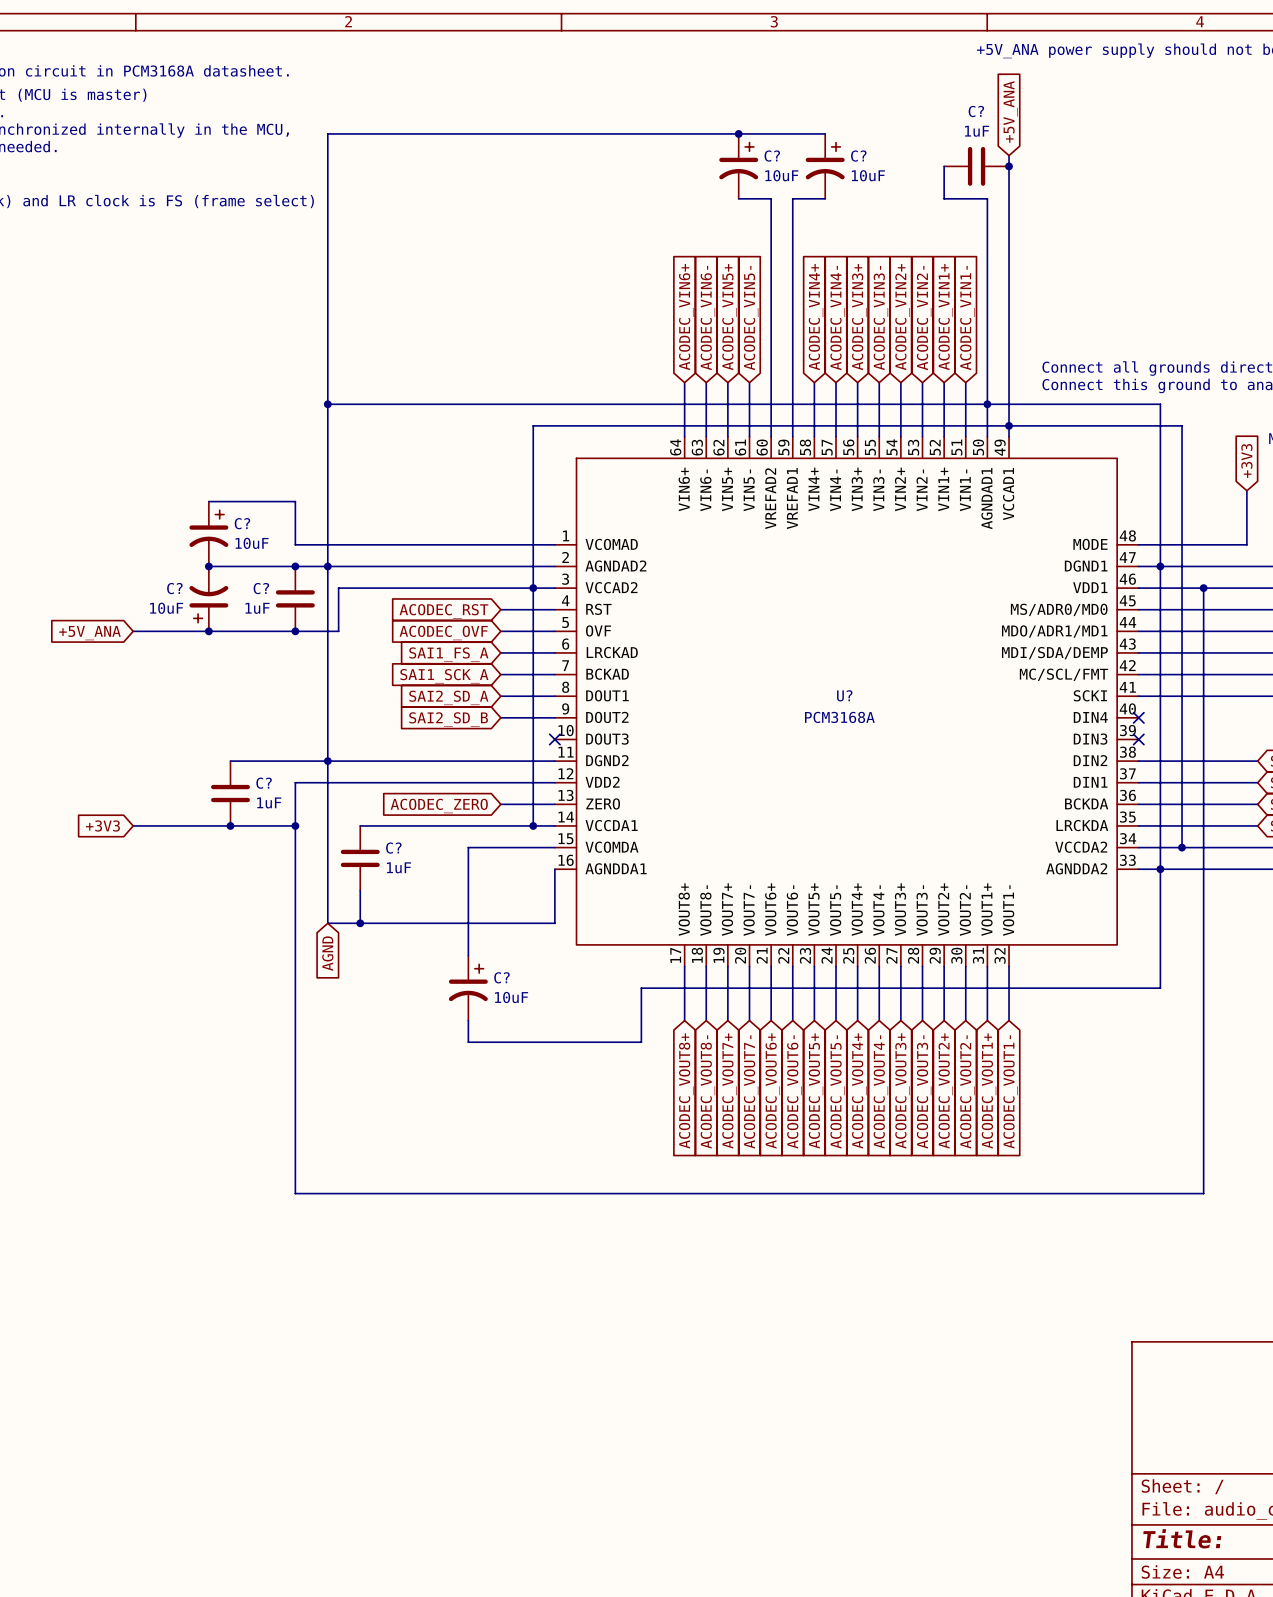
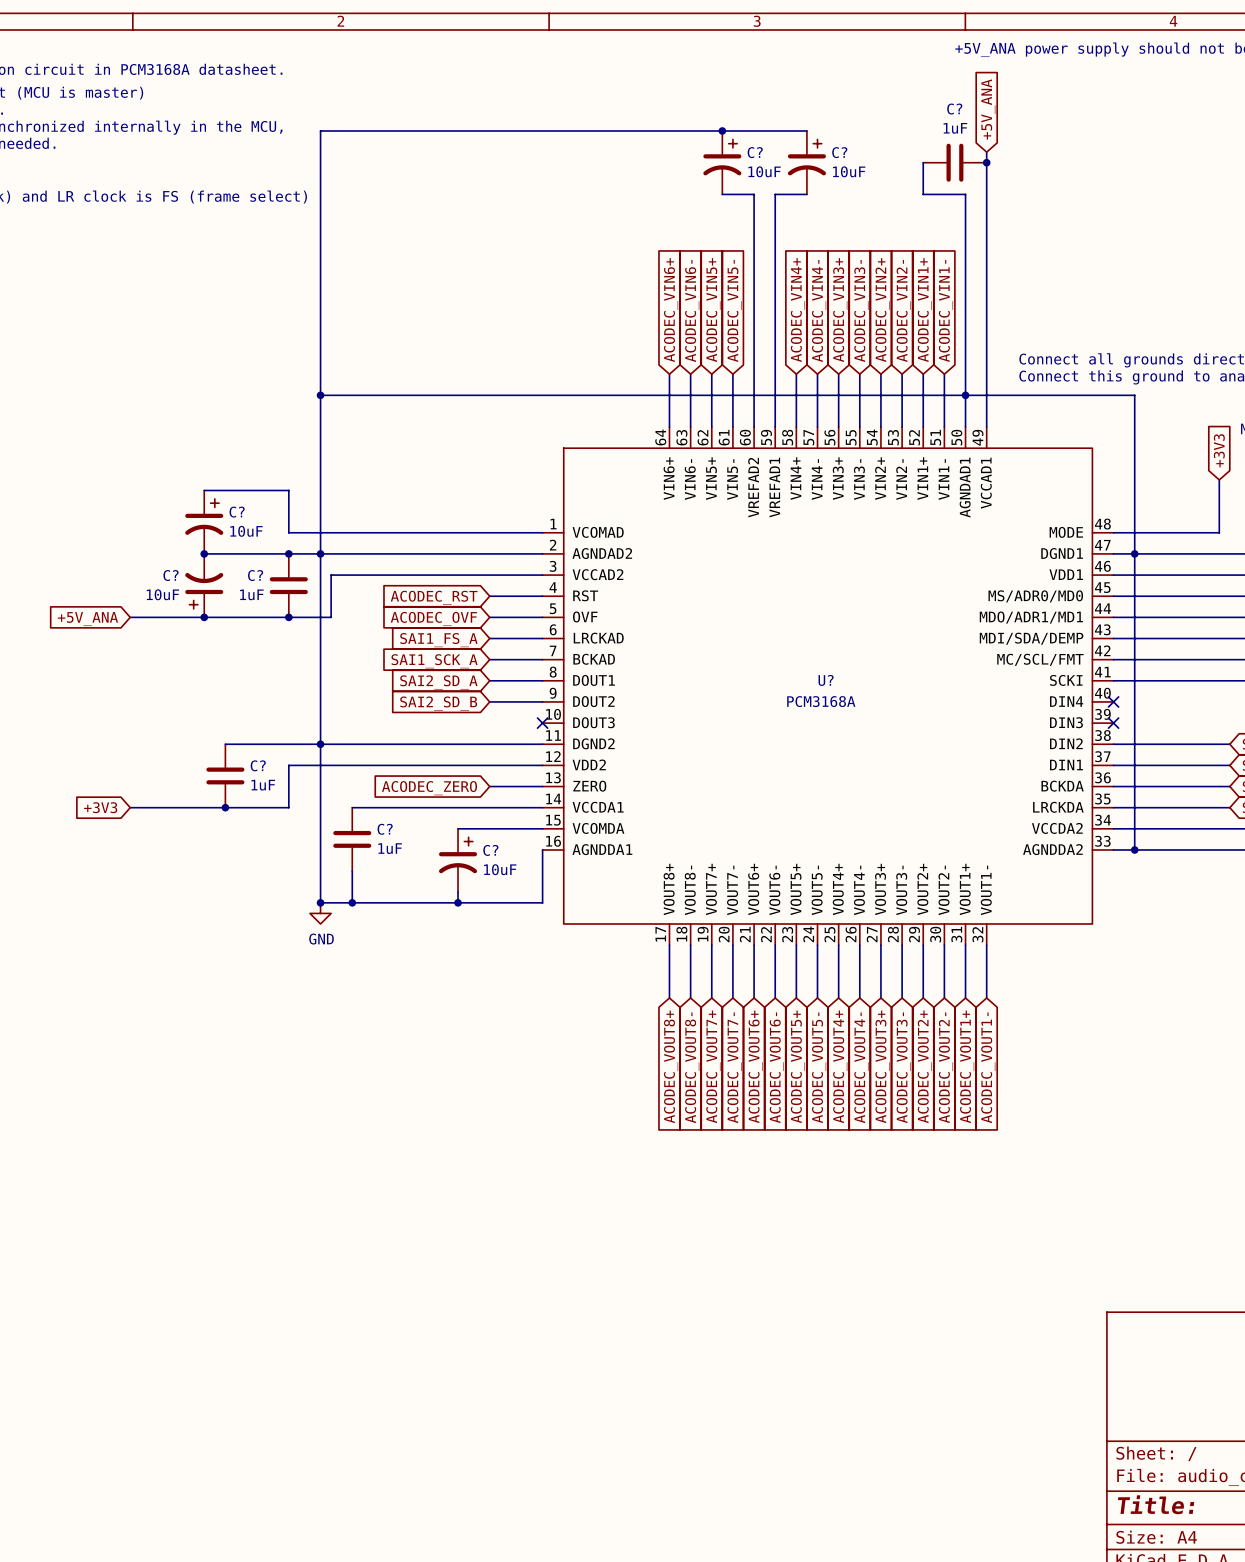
junction: (1009, 425) -> none
junction: (533, 588) -> none
wire: (1203, 588) (1203, 1193) (295, 1193) (295, 825) -> none
junction: (1203, 588) -> none
junction: (295, 825) -> none
wire: (533, 825) (533, 425) (1182, 425) (1182, 847) -> none
junction: (533, 825) -> none
junction: (1182, 847) -> none
wire: (1160, 869) (1160, 988) (641, 988) (641, 1042) (468, 1042) (468, 1020) -> none
junction: none -> (320, 902)
wire: (468, 923) (468, 955) -> none
junction: none -> (458, 902)
power symbol: none -> GND (320, 913)
global label: AGND (327, 953) -> none
C? position: (468, 988) -> (458, 860)

